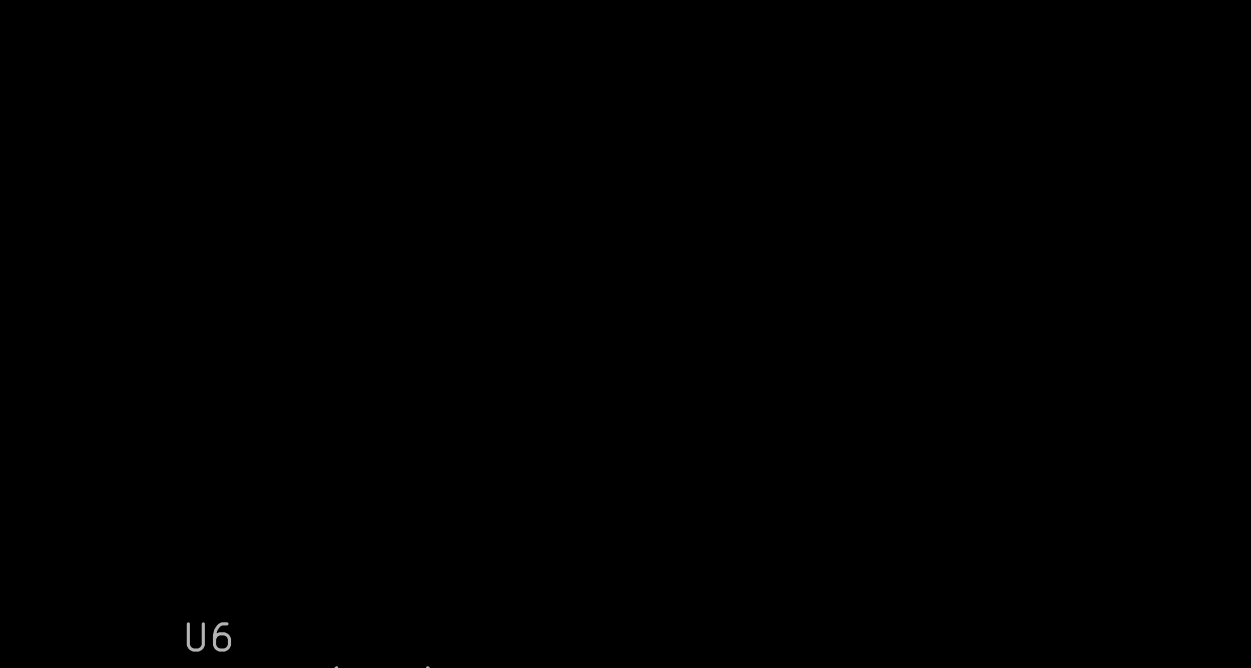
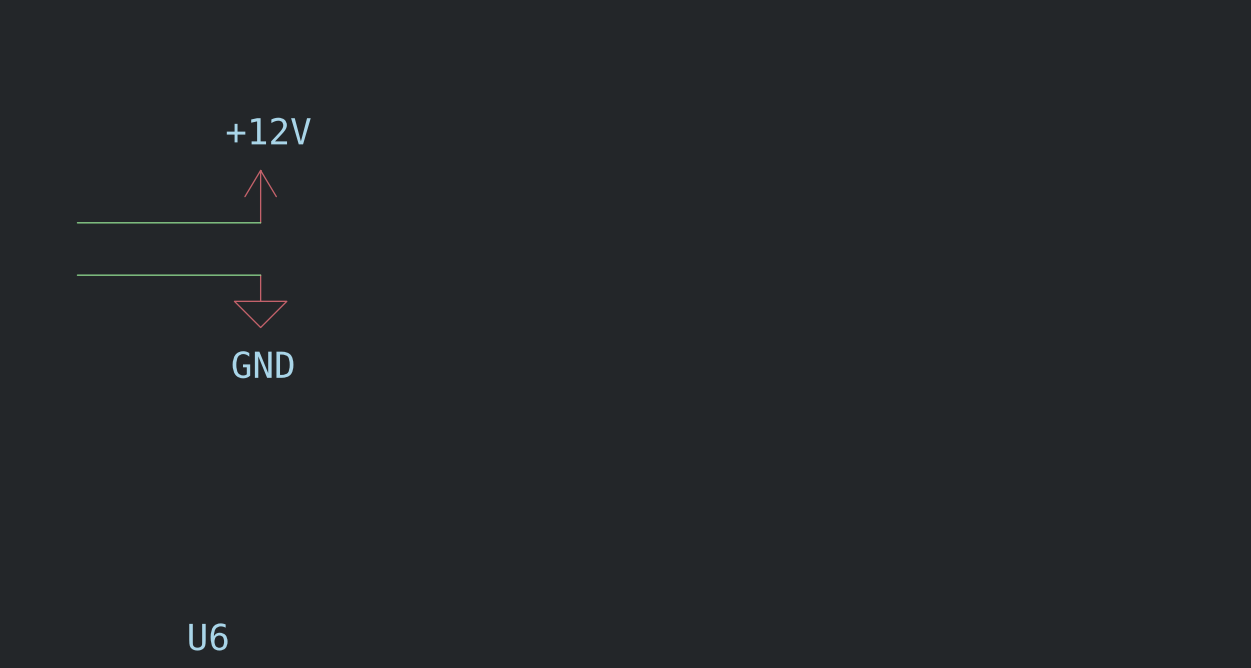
power symbol: none -> +12V (260, 196)
wire: none -> (77, 222) (260, 222)
wire: none -> (77, 275) (260, 275)
power symbol: none -> GND (260, 301)

